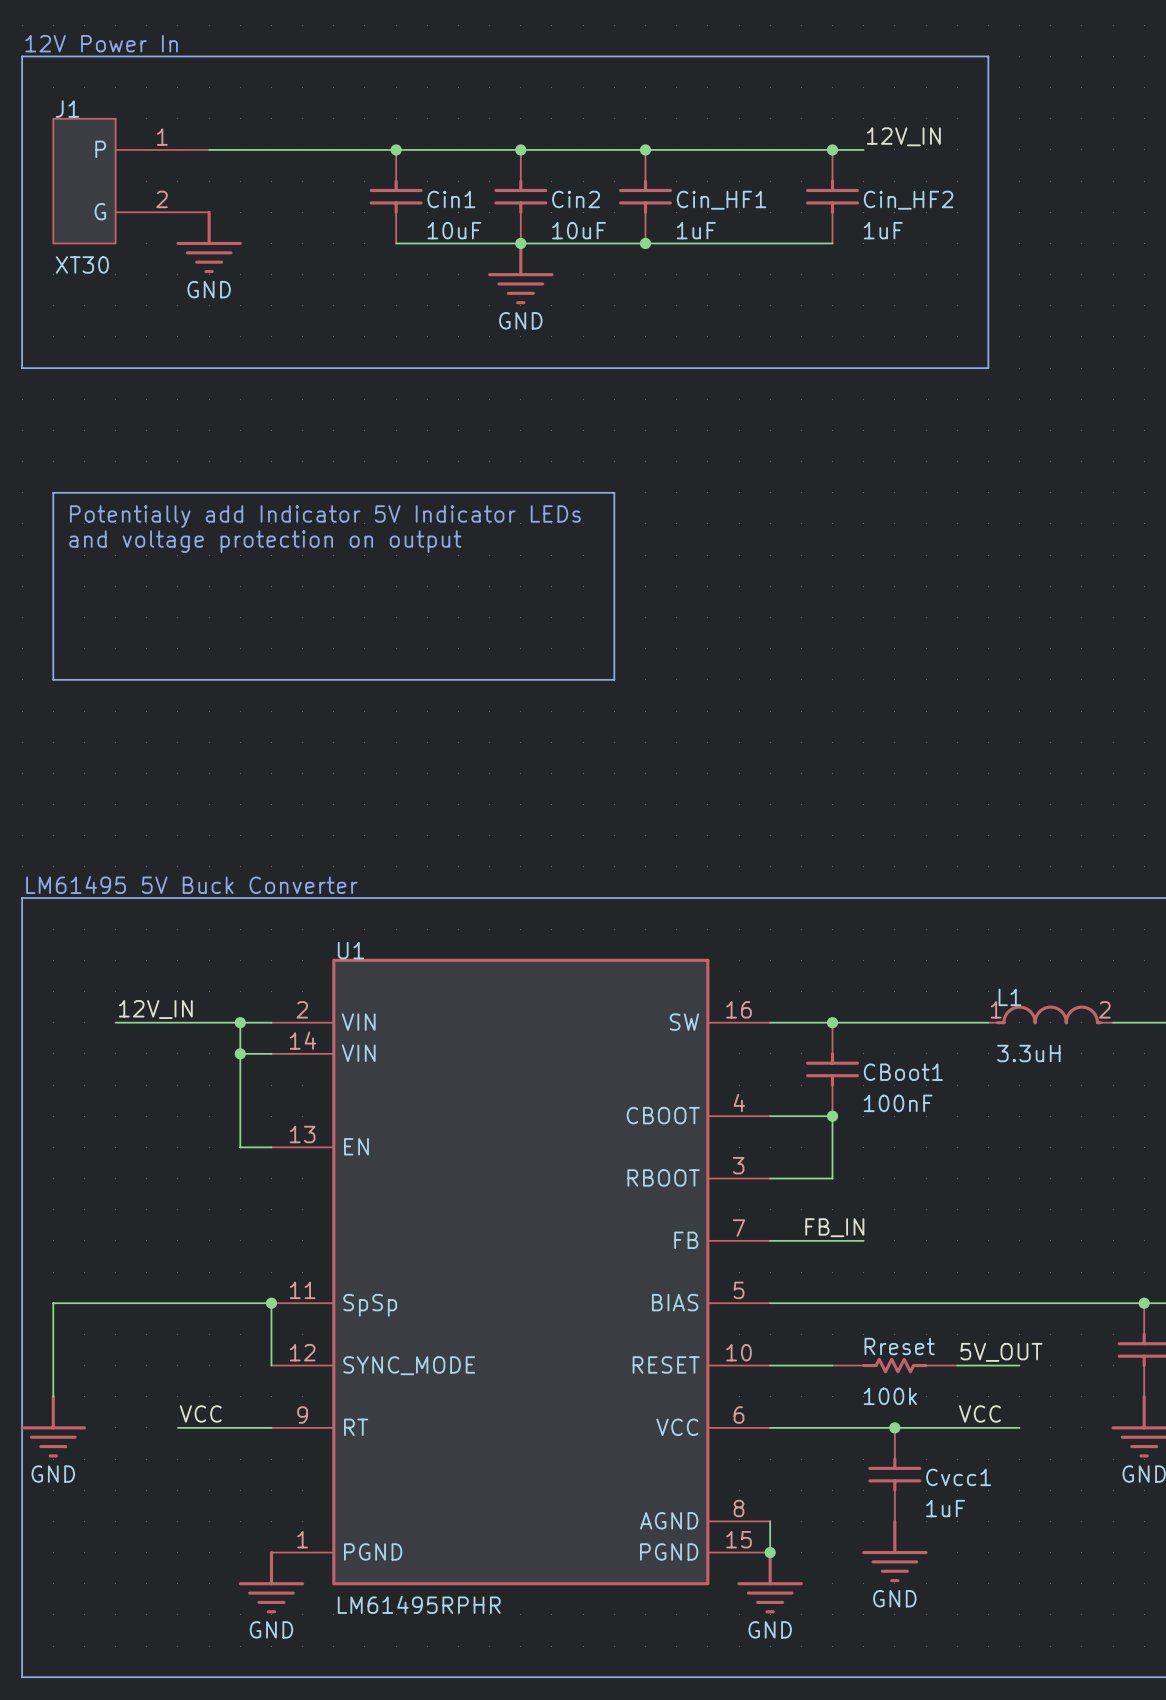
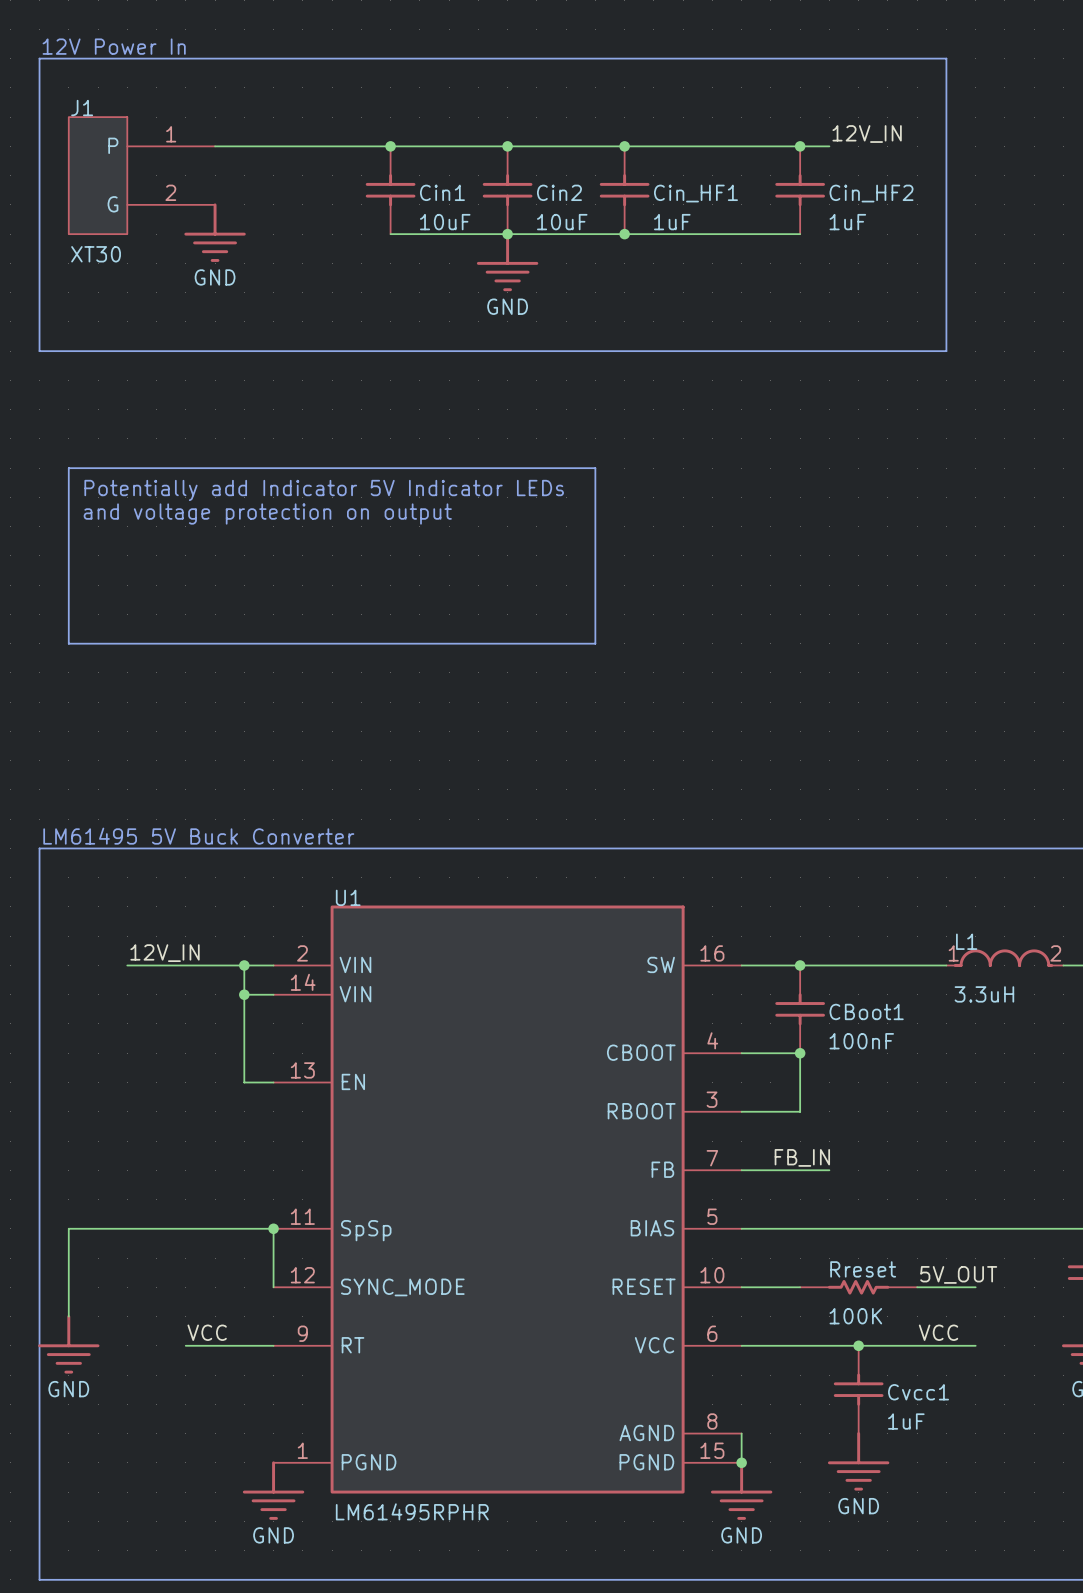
Rreset value: 100k (890, 1396) -> 100K (855, 1316)

